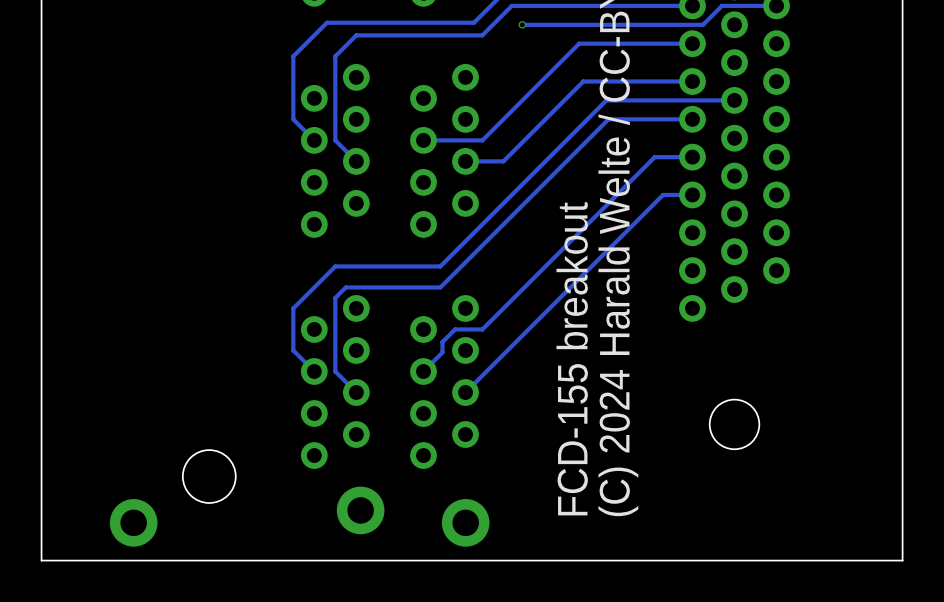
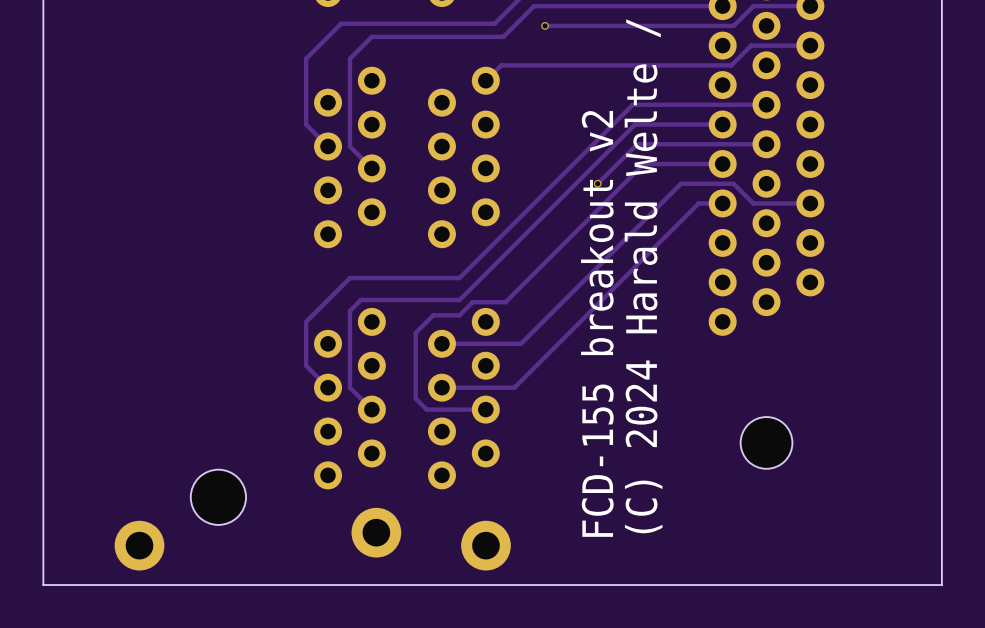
track: (692, 43) (579, 43) (482, 140) (423, 140) -> none
track: none -> (810, 45) (751, 45) (731, 65) (501, 65) (485, 80)
track: (692, 81) (583, 81) (503, 161) (465, 161) -> none
track: none -> (766, 144) (637, 144) (597, 183)
track: (654, 157) (482, 329) -> (810, 203) (753, 203) (733, 183) (681, 183) (520, 343) (503, 343)
via: none -> (597, 183)
track: (669, 194) (663, 194) (465, 392) -> (683, 163) (643, 163) (505, 302) (472, 302) (459, 315) (433, 315) (415, 332) (415, 398) (426, 409) (485, 409)
track: none -> (698, 203) (514, 387) (441, 387)
track: (455, 329) (442, 342) (442, 352) (423, 371) -> (474, 343) (441, 343)
text: FCD-155 breakout (572, 358) -> FCD-155 breakout v2 (597, 323)

